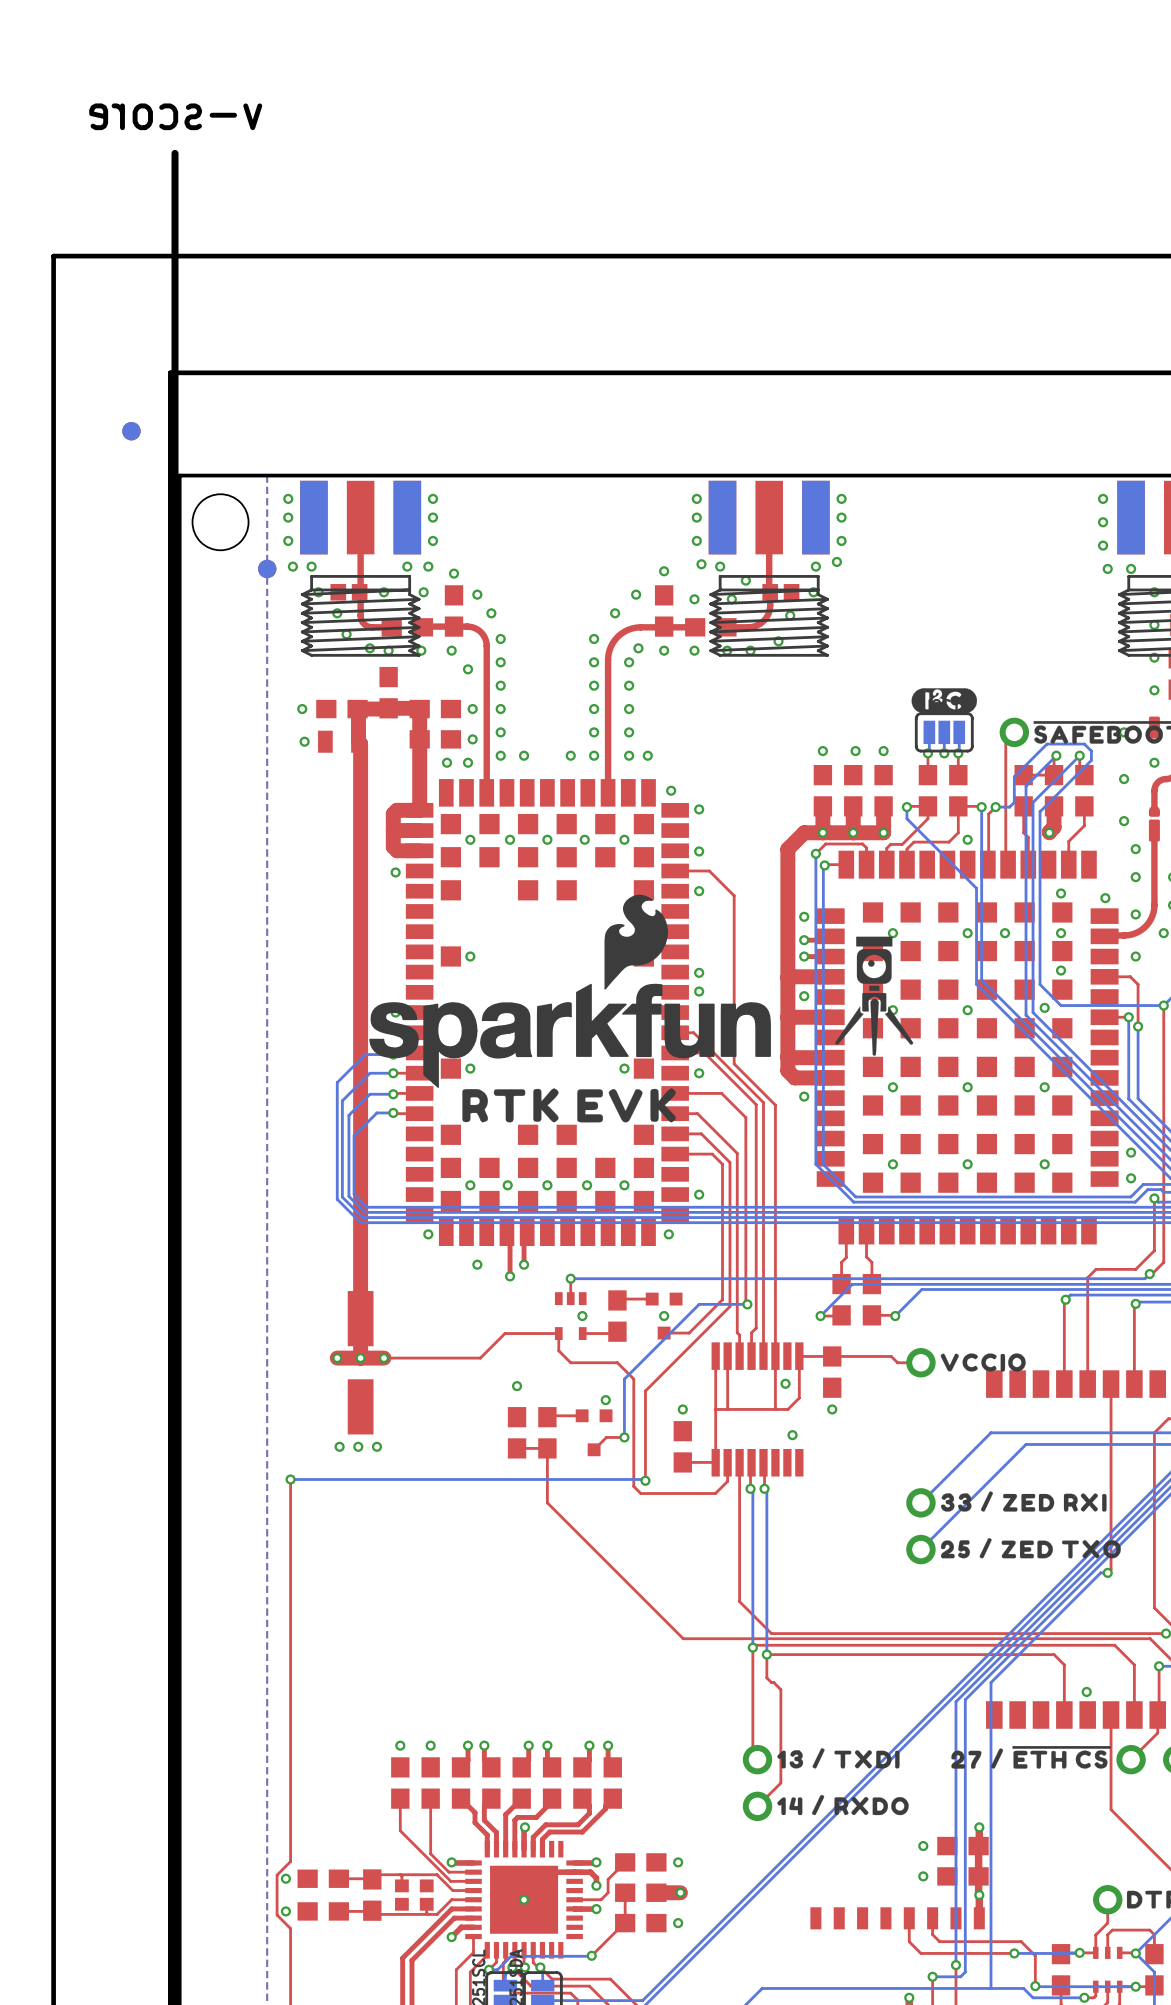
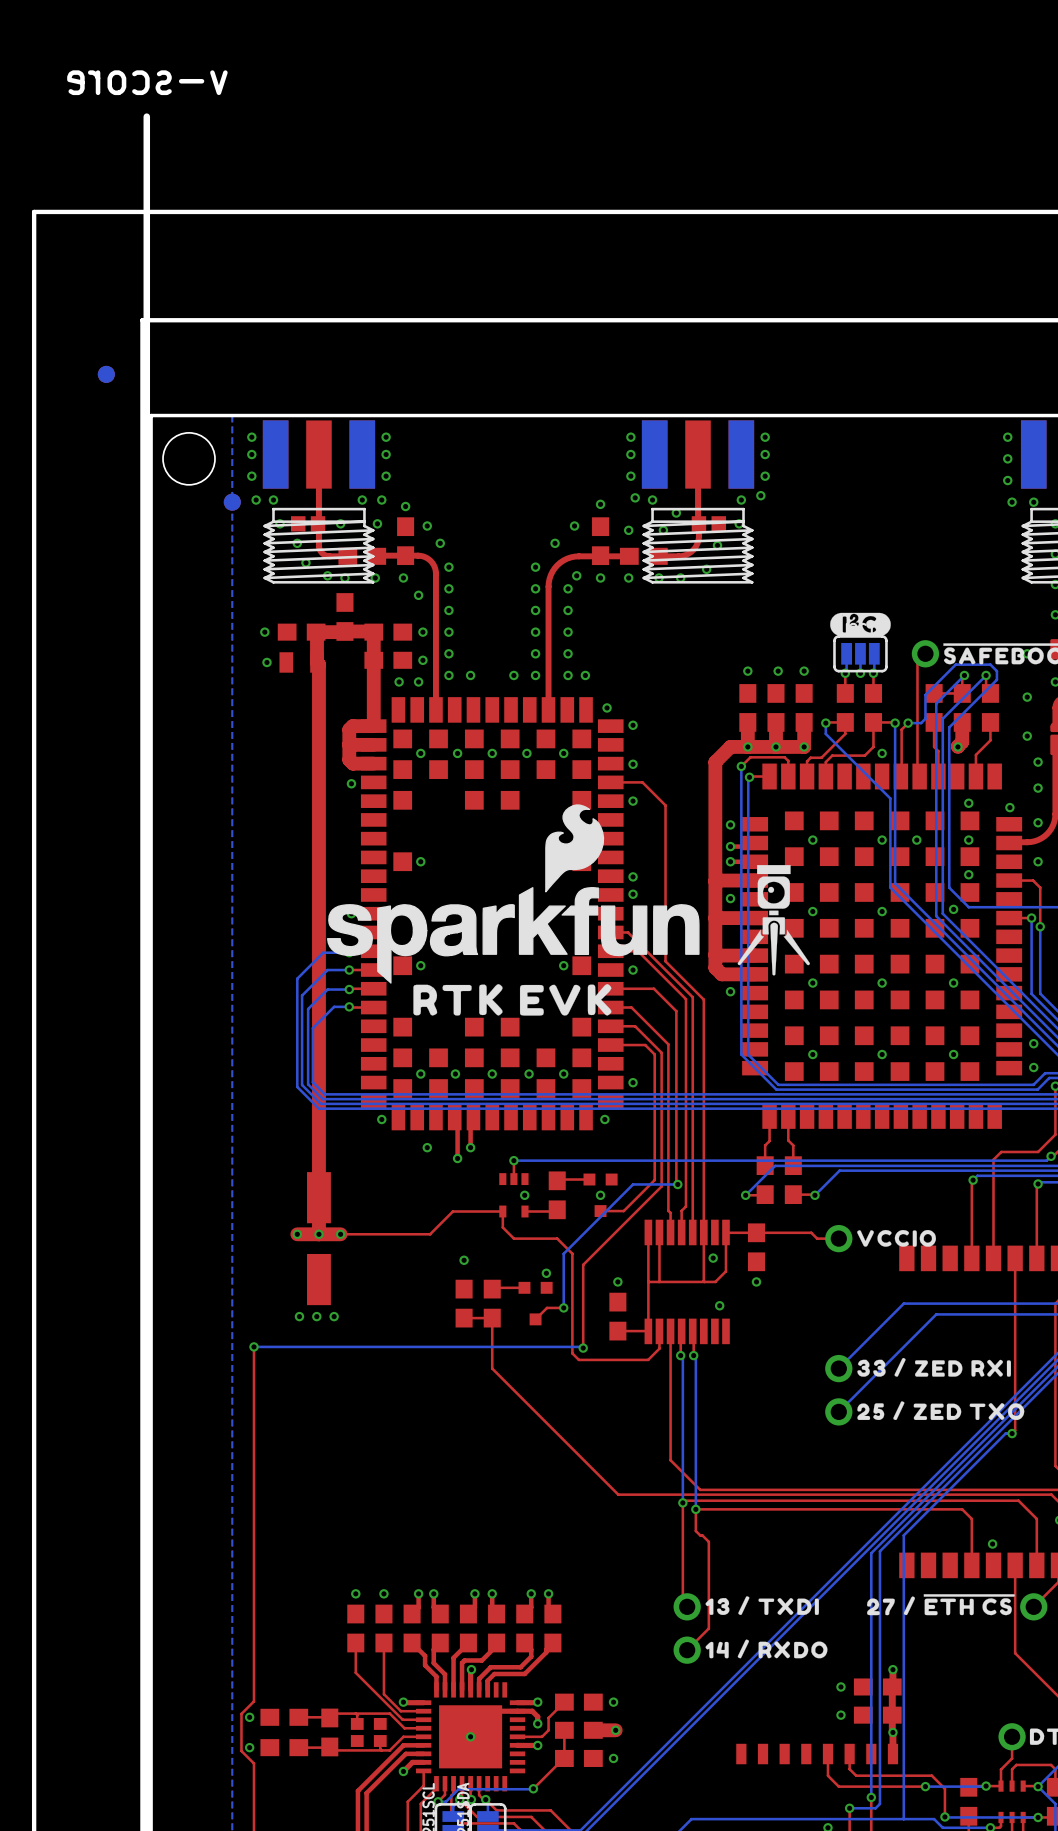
drawing position: (874, 996) -> (773, 920)

